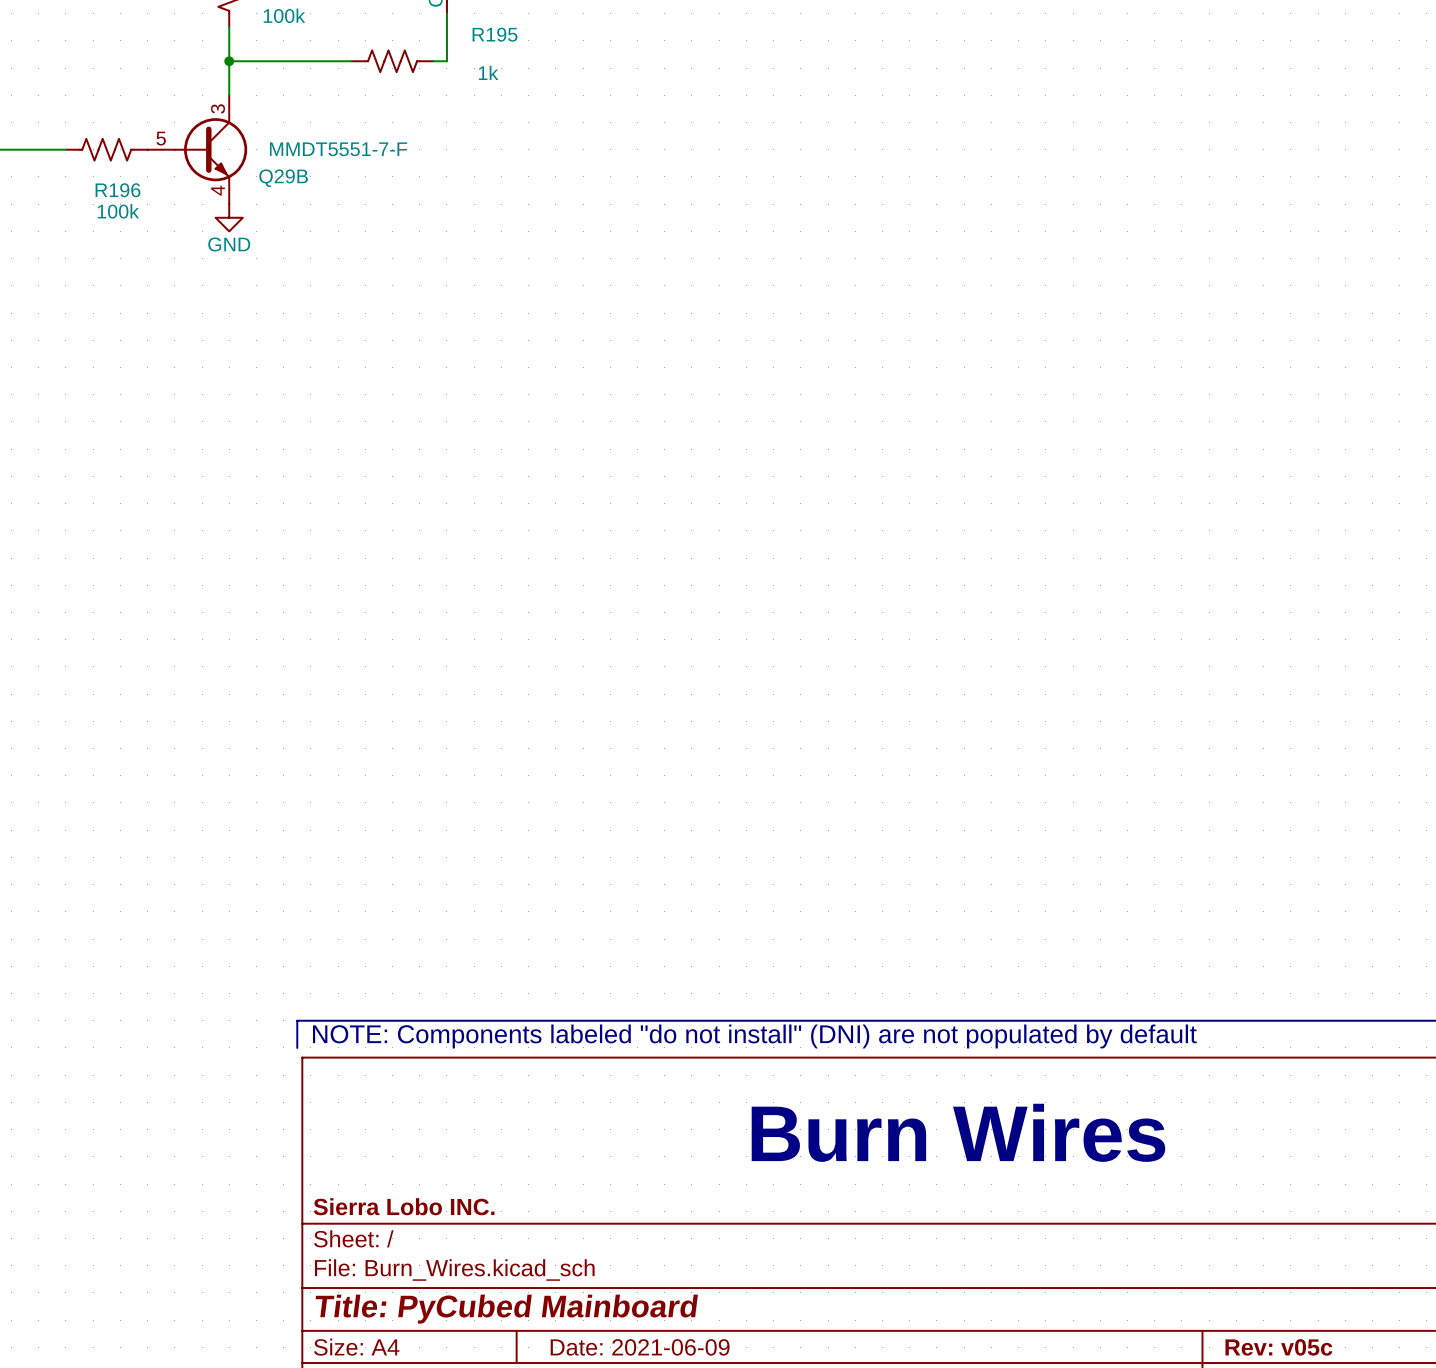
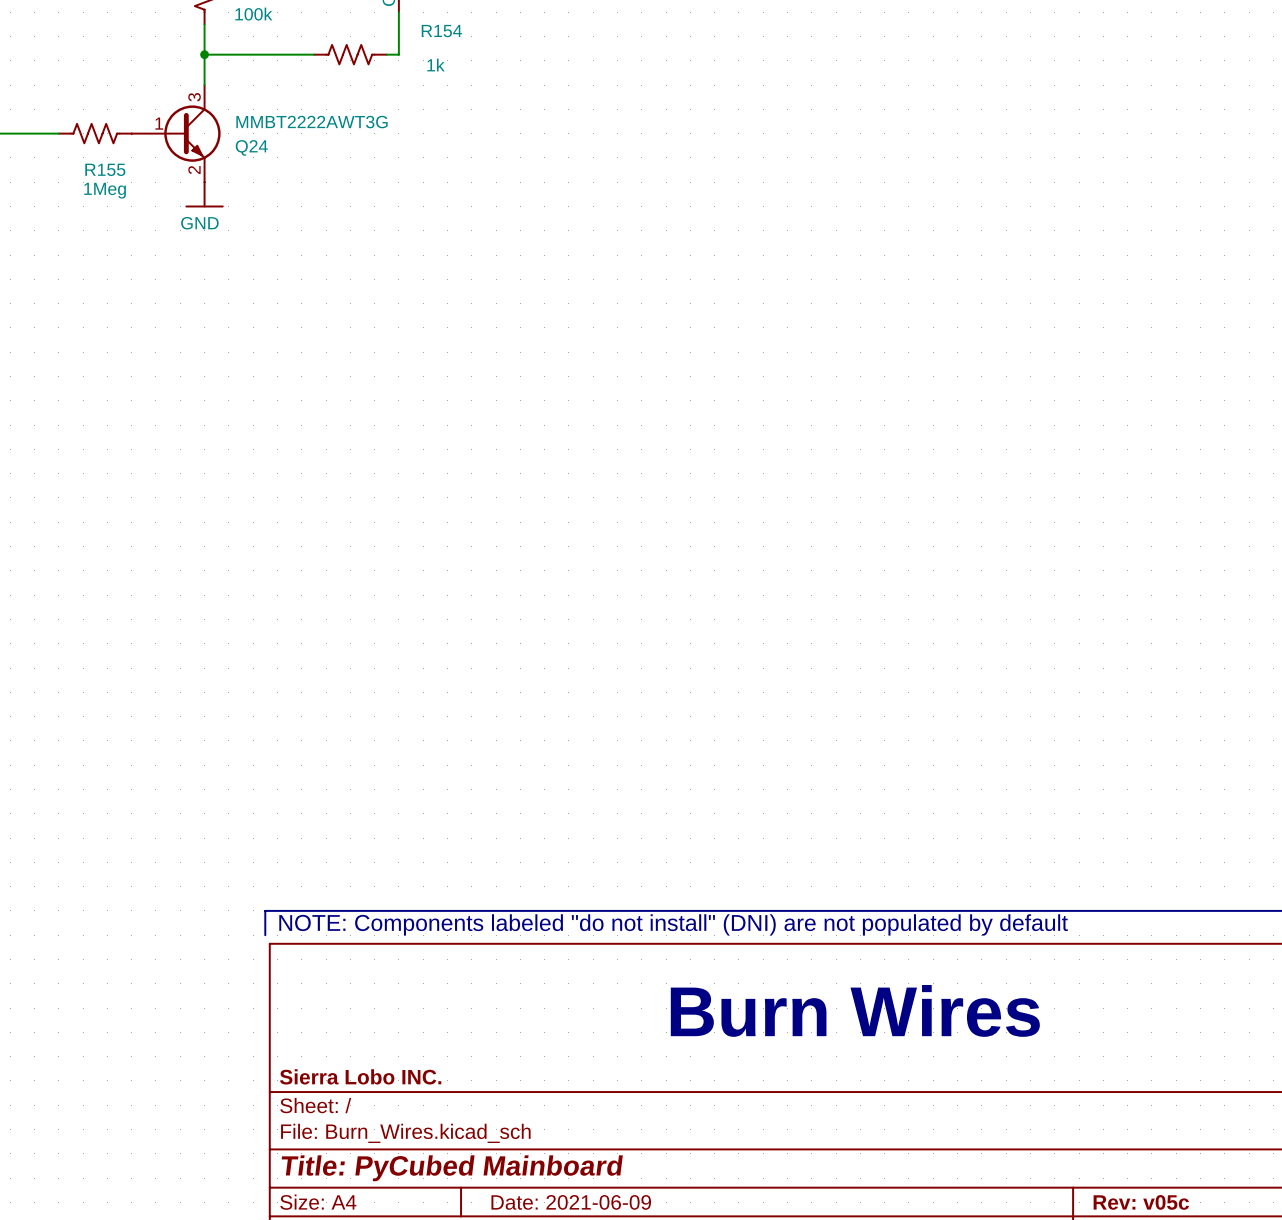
R195 name: R195 (495, 34) -> R154 (441, 31)
Q29B: MMDT5551-7-F (197, 149) -> none
Q24: none -> MMBT2222AWT3G (176, 133)
R196 name: R196 (118, 190) -> R155 (105, 169)
power symbol shape: [215, 204, 243, 232] -> [186, 182, 223, 207]
R196 value: 100k (118, 211) -> 1Meg (105, 190)

